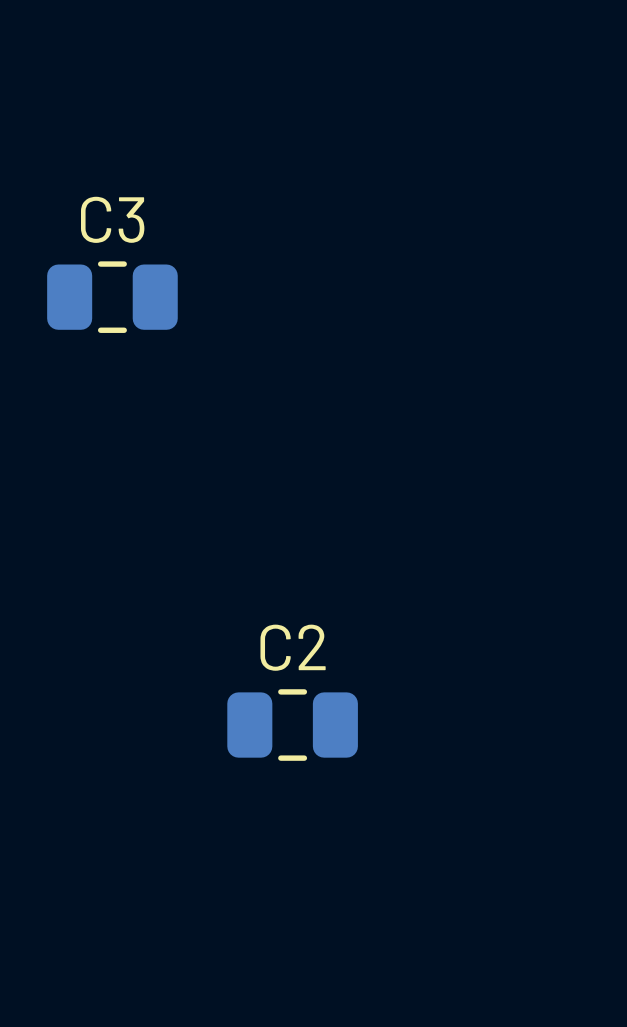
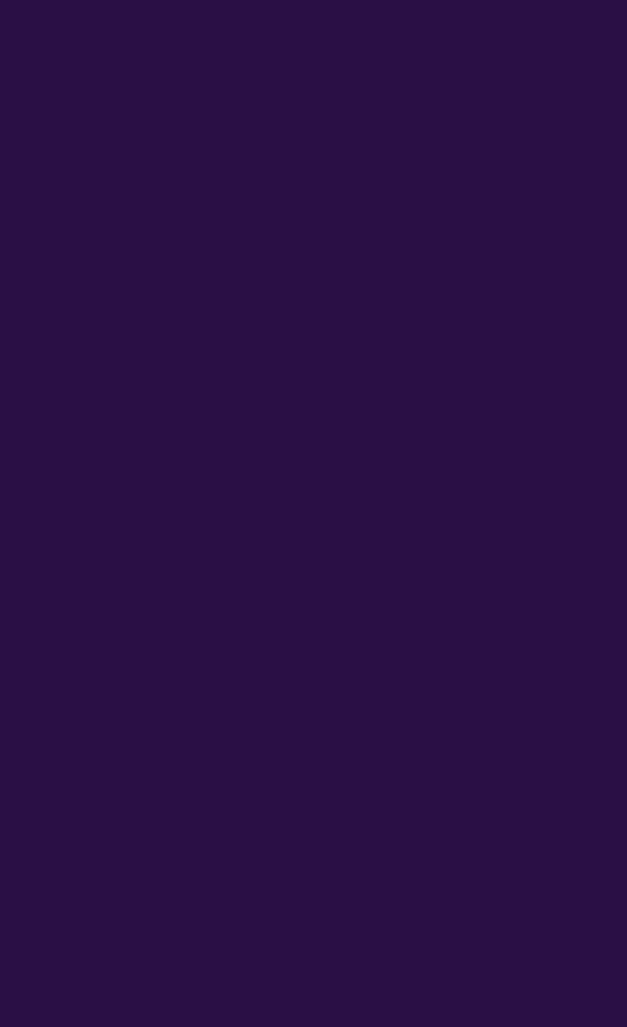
C3: (112, 297) -> none
C2: (292, 725) -> none

